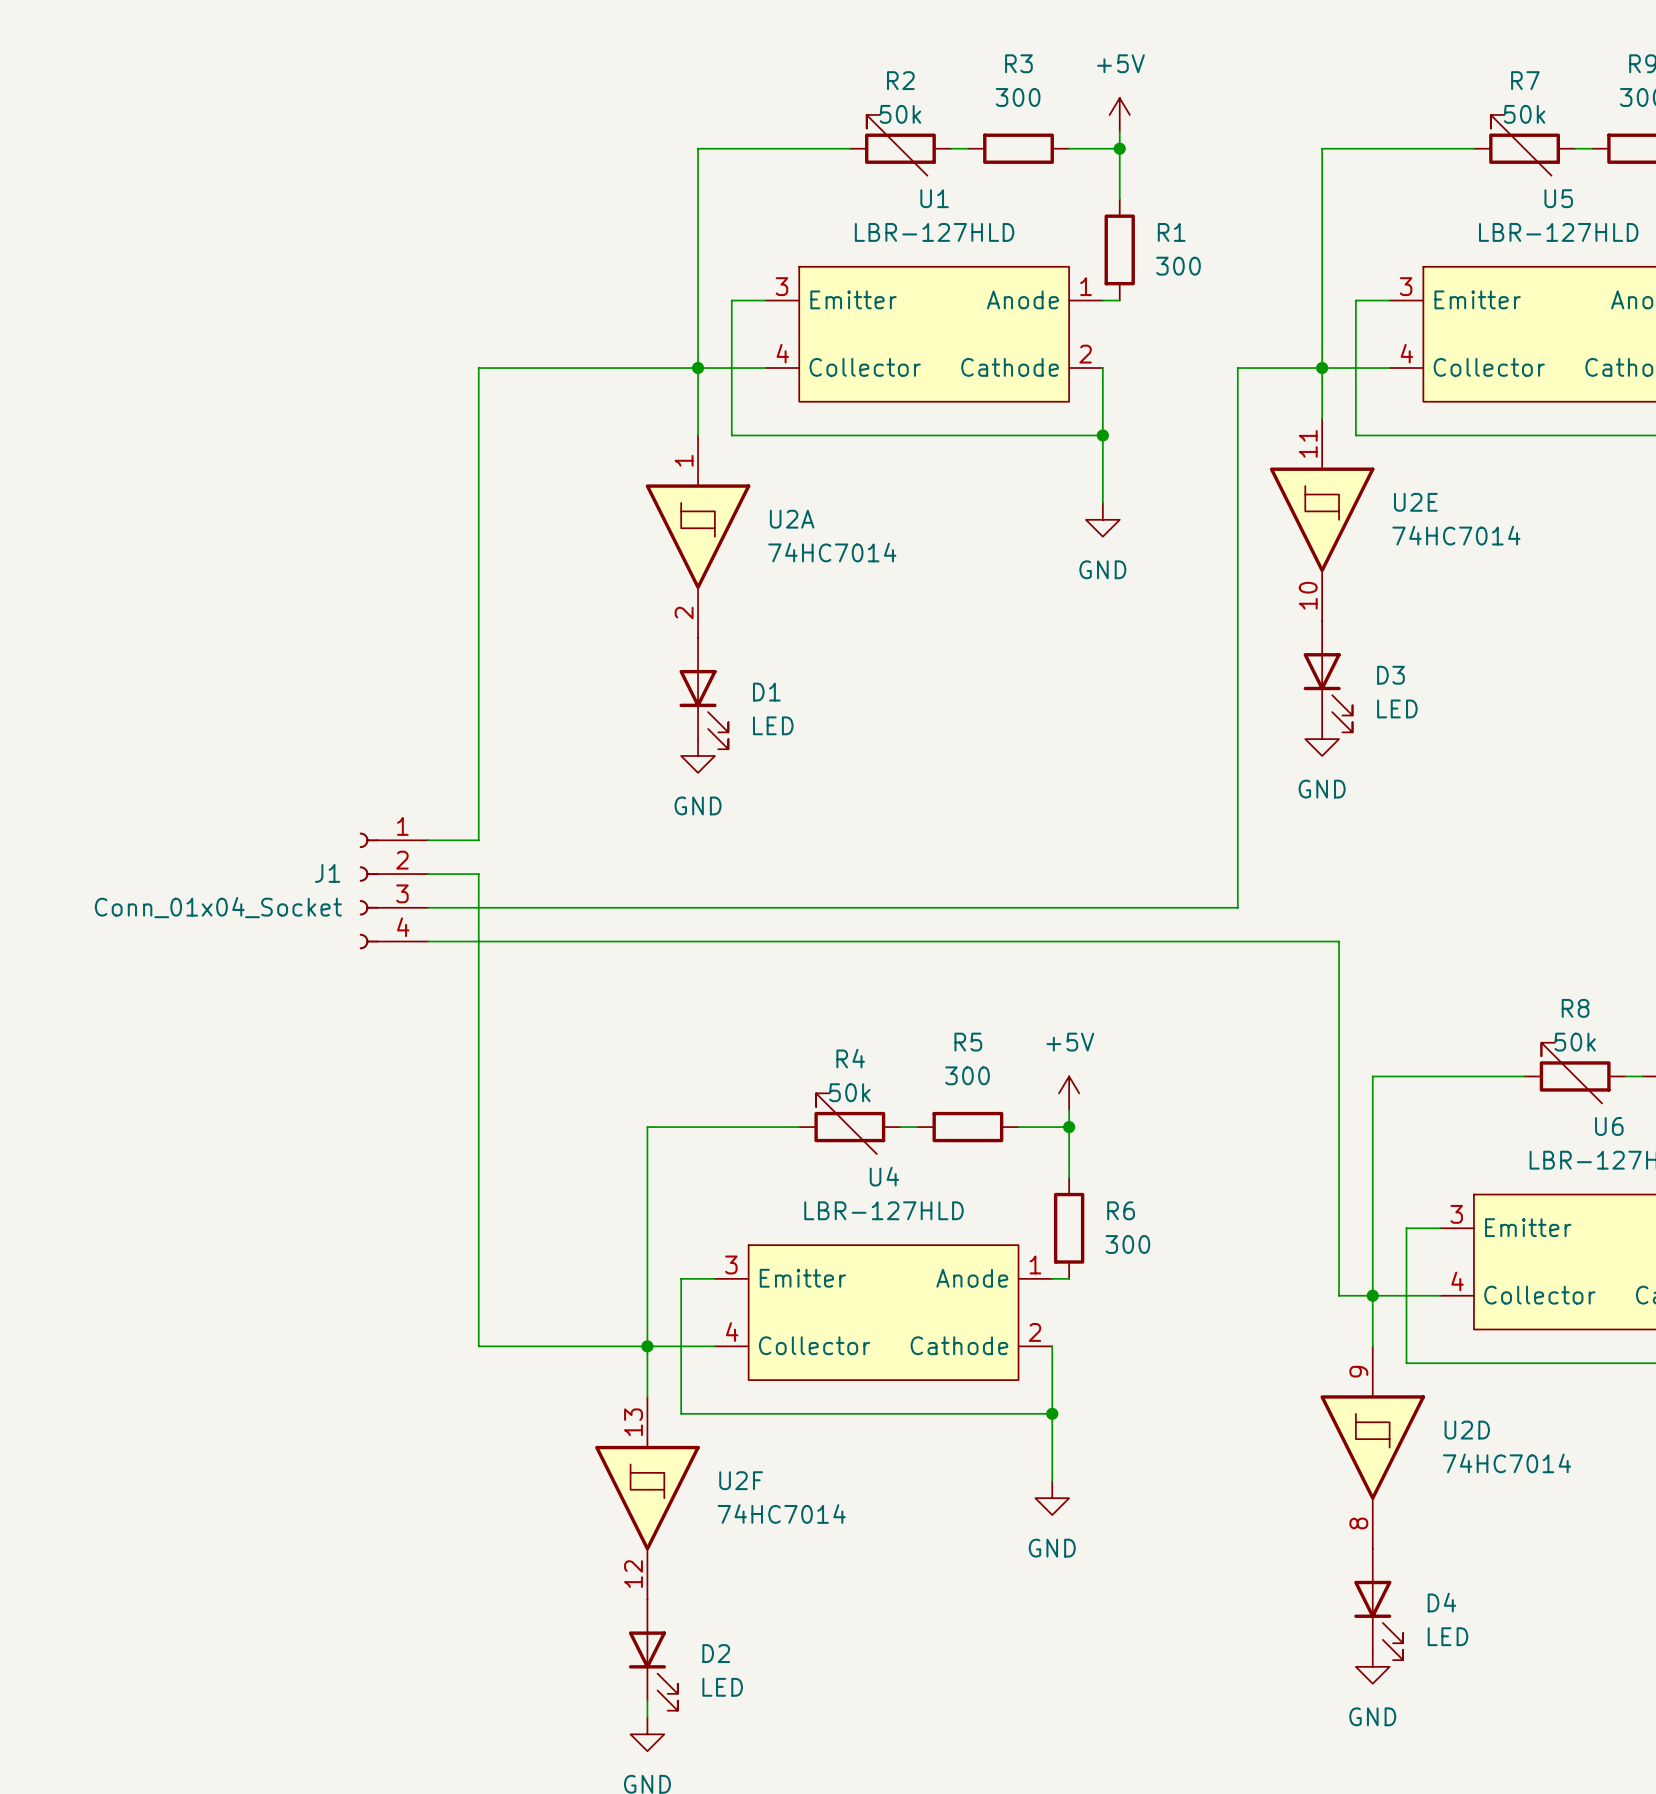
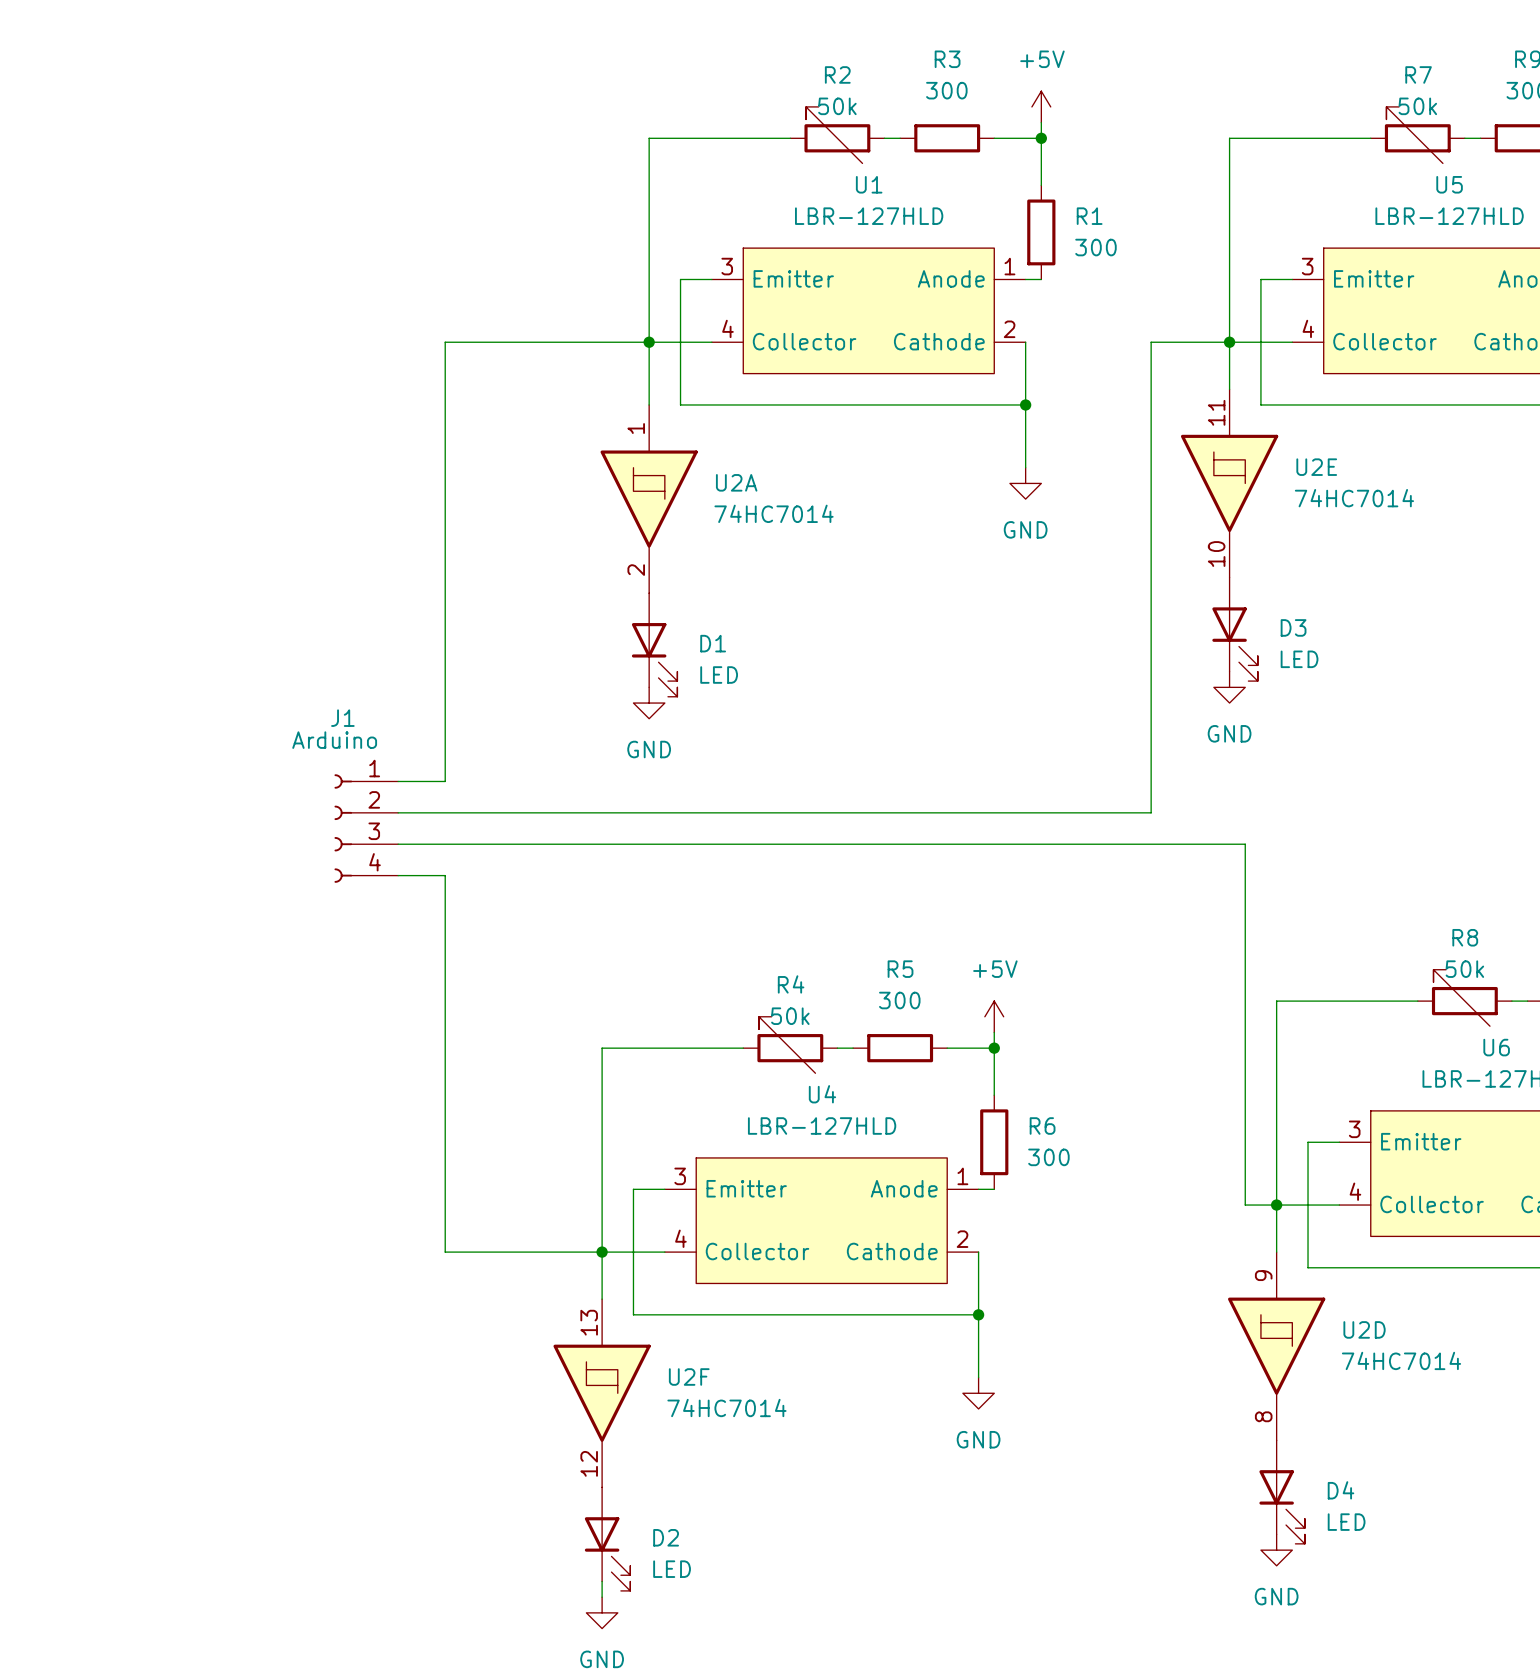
J1 name position: J1 (327, 873) -> J1 (342, 718)
wire: (478, 874) (478, 941) (1339, 941) -> (445, 812) (1151, 812)
wire: (1237, 874) (1237, 907) -> (1245, 875) (1245, 844) (1151, 844)
J1 value: Conn_01x04_Socket (218, 907) -> Arduino (334, 740)

